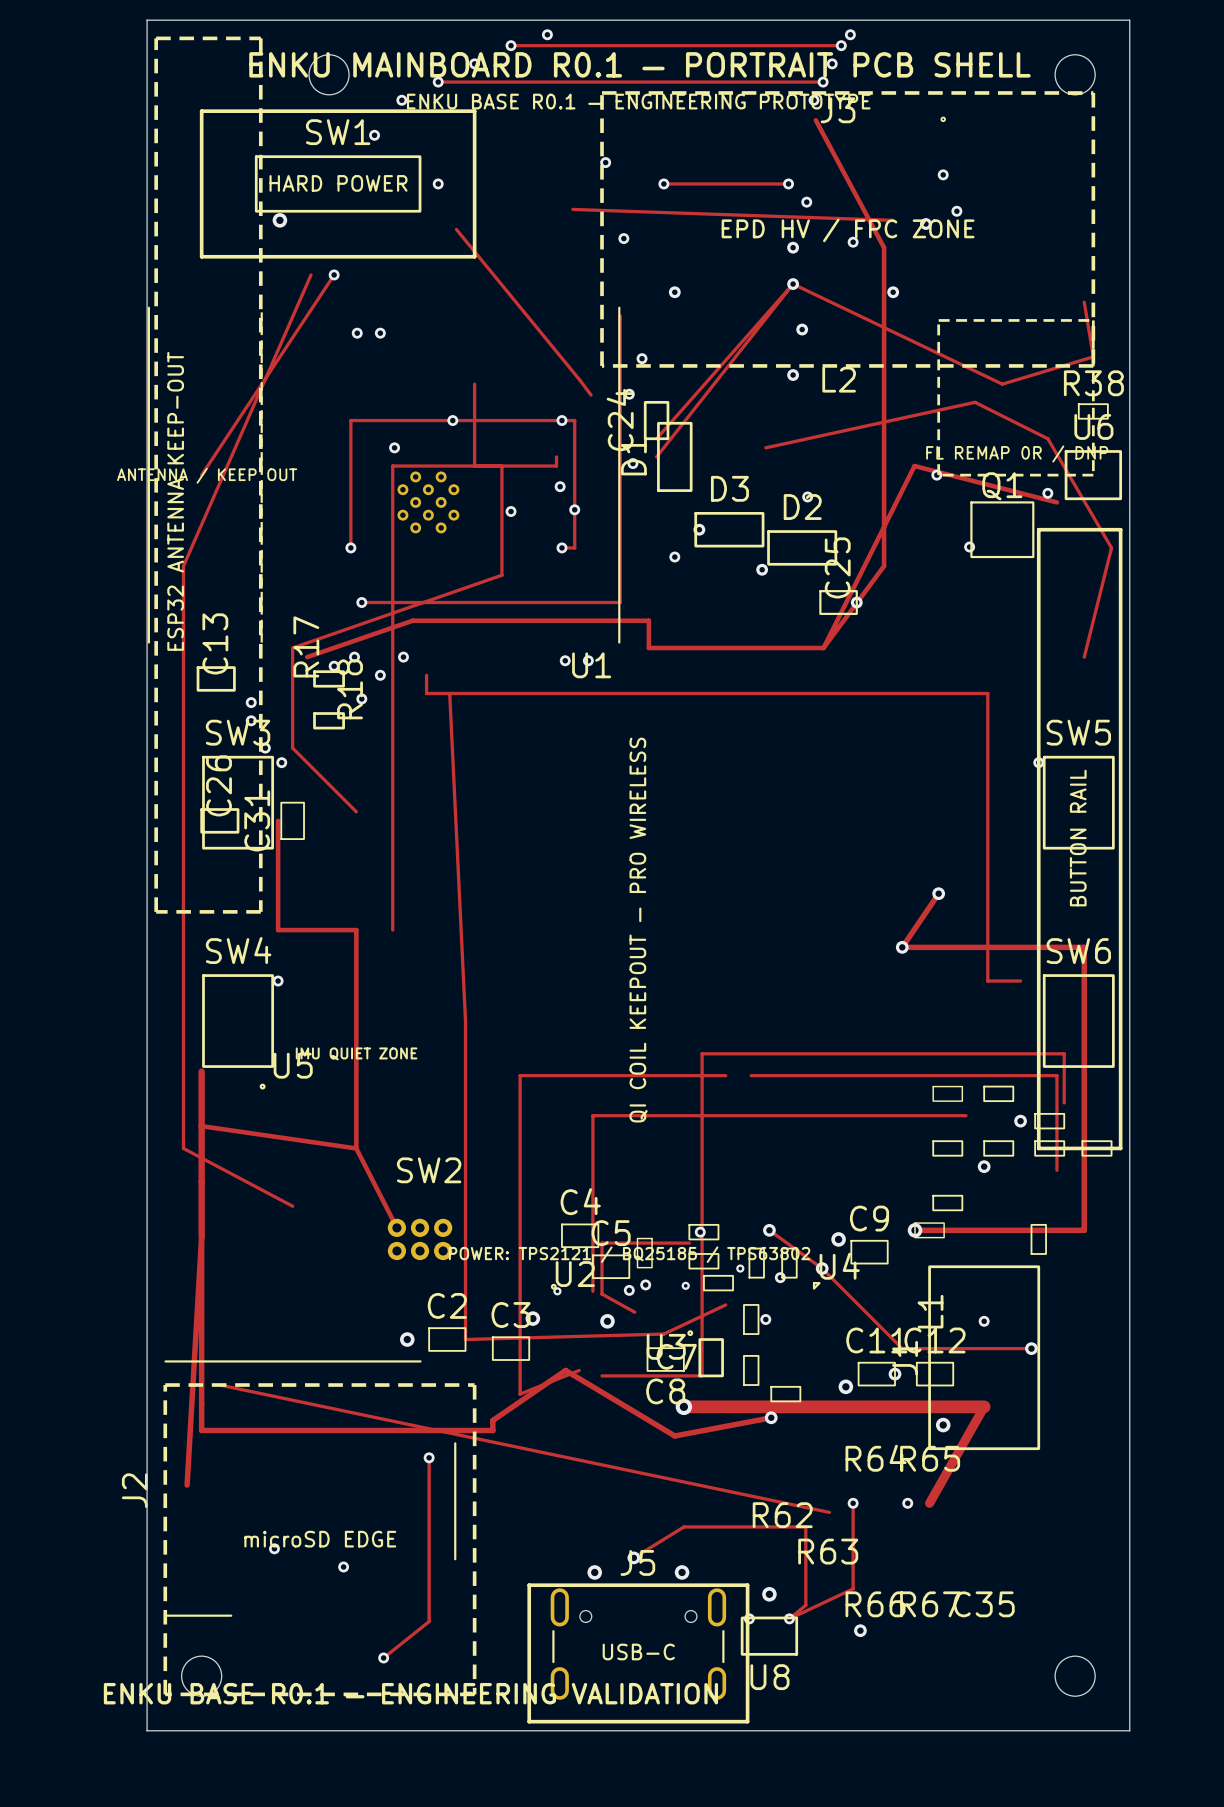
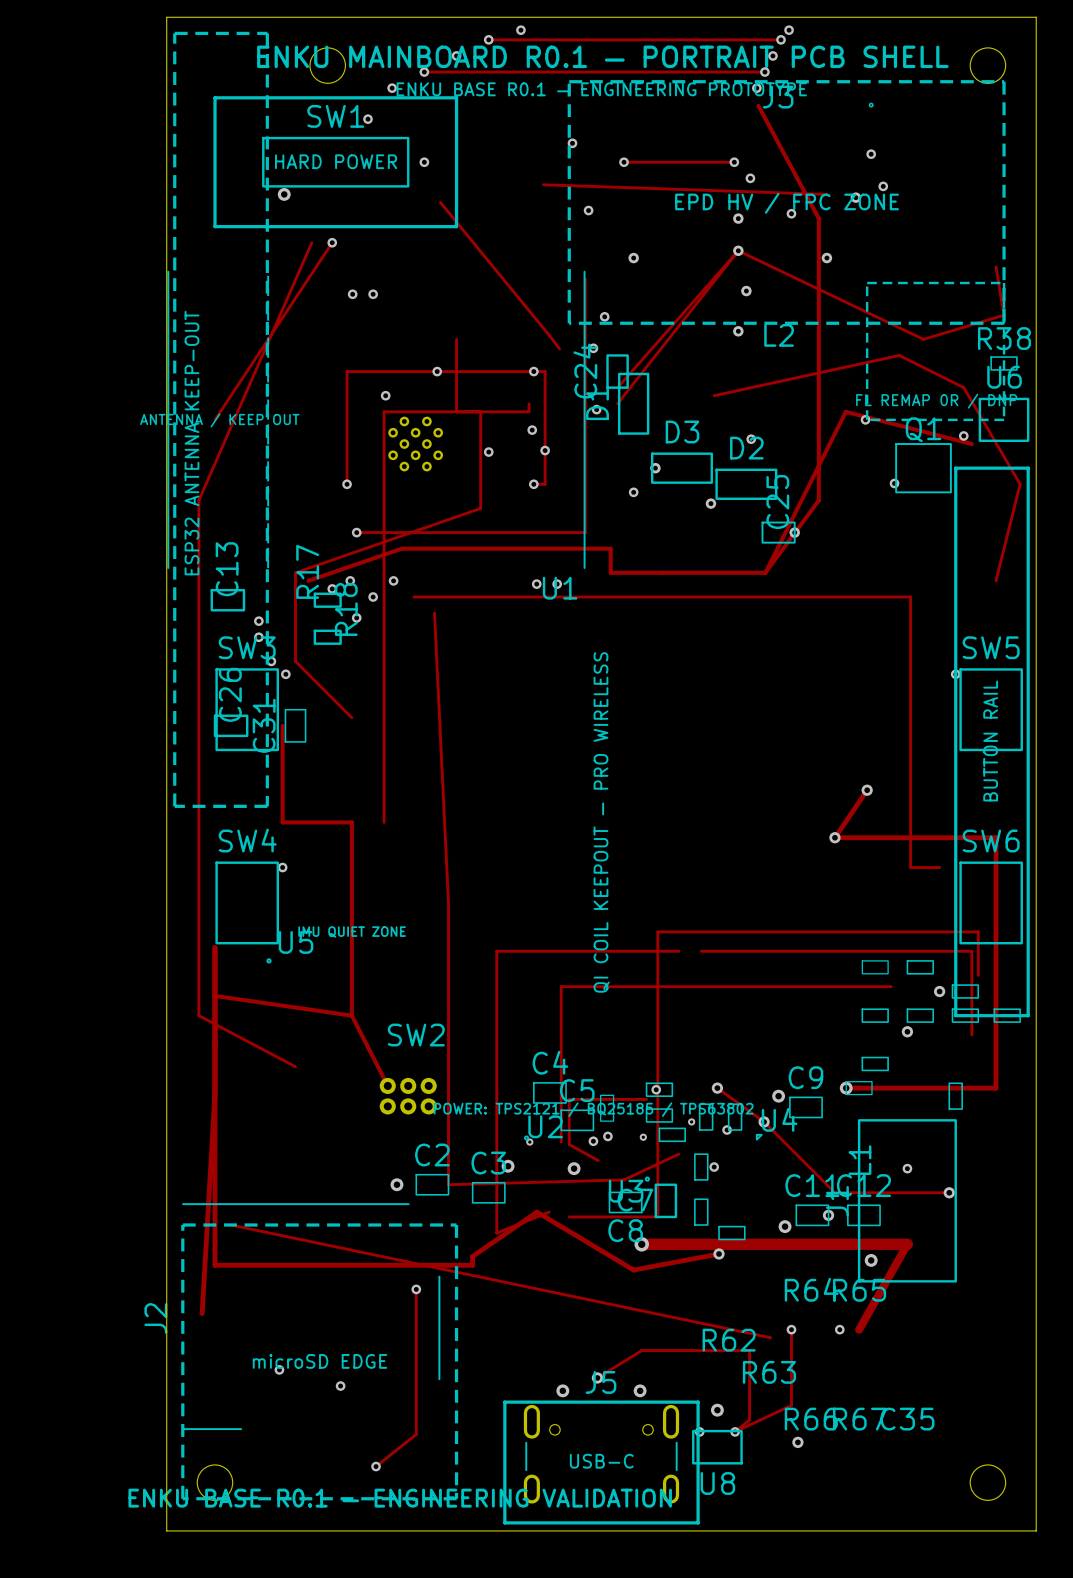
track: (426, 675) (426, 693) (987, 693) -> (414, 596) (910, 596) (910, 613)

